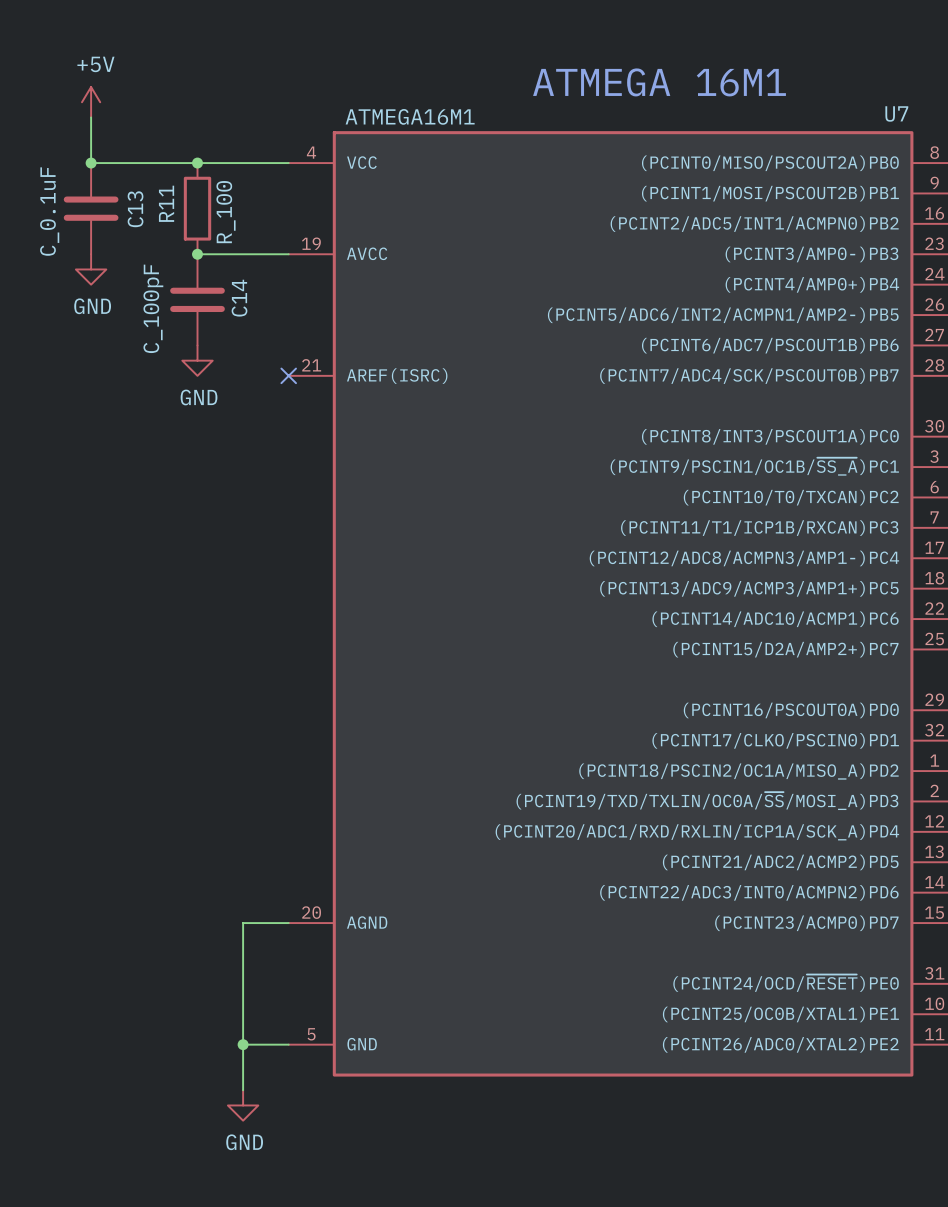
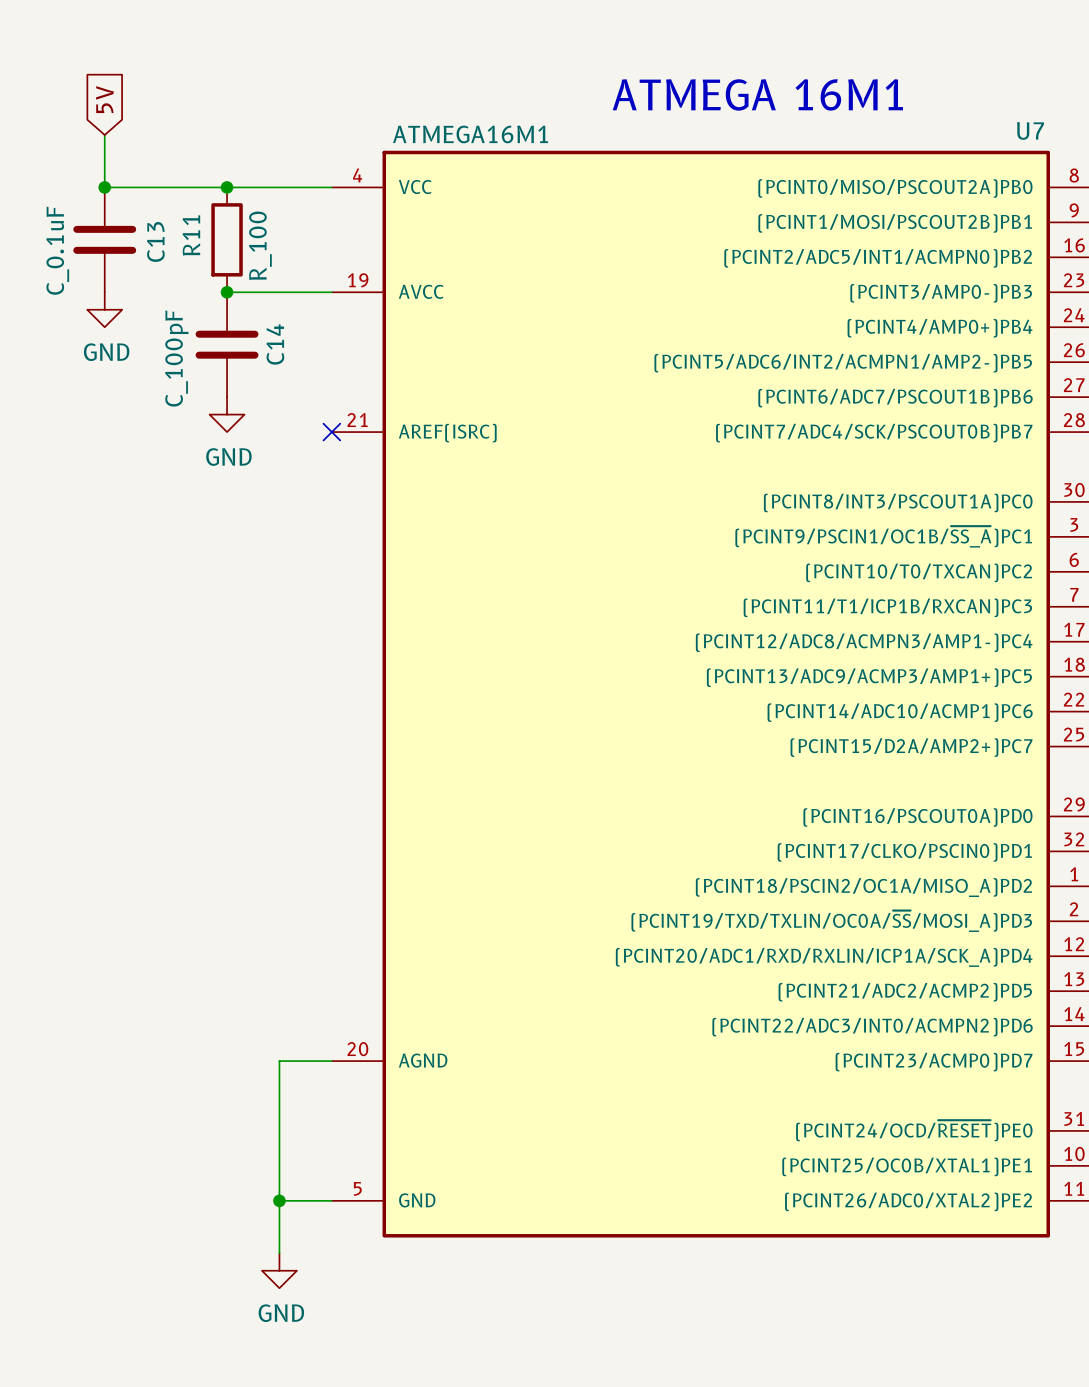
global label: none -> 5V (104, 99)
power symbol: +5V (91, 102) -> none

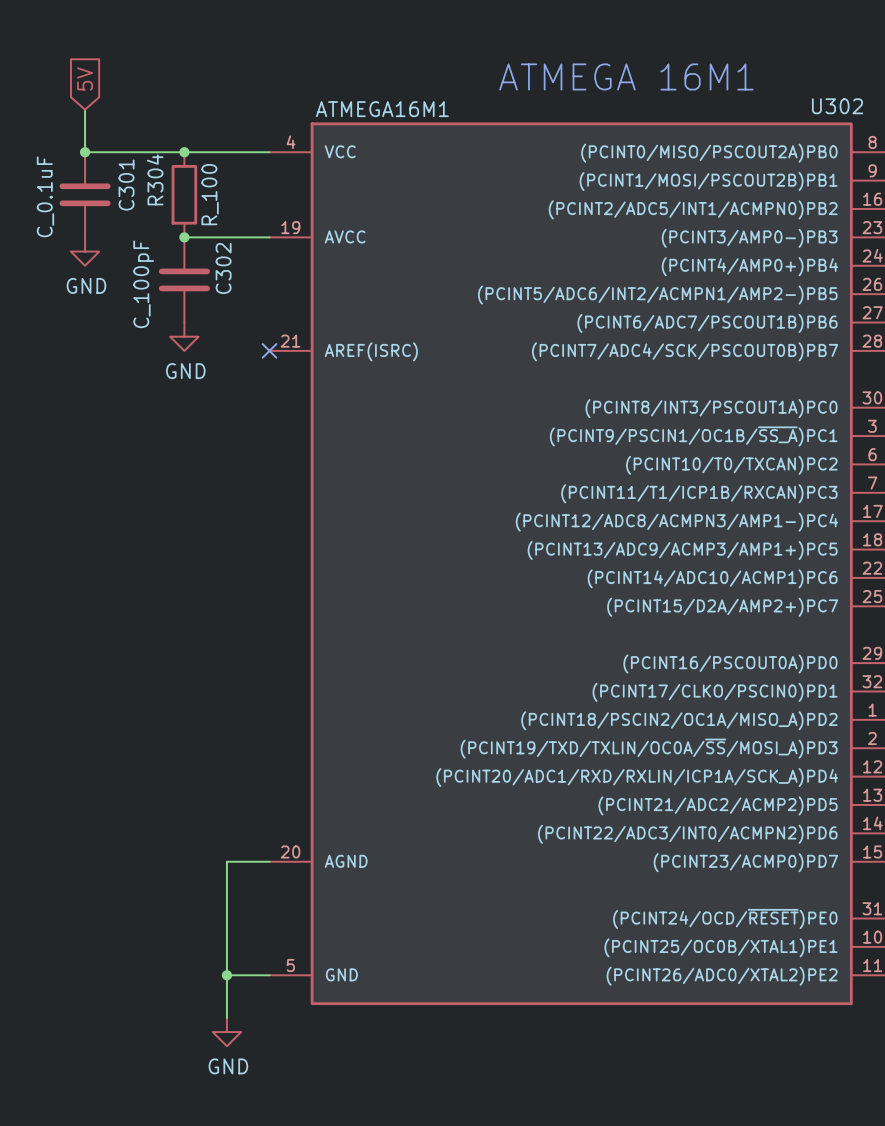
U7 name: U7 (1030, 130) -> U302 (837, 106)
R11 name: R11 (191, 235) -> R304 (155, 179)
C13 name: C13 (155, 241) -> C301 (126, 185)
C14 name: C14 (275, 344) -> C302 (223, 268)

